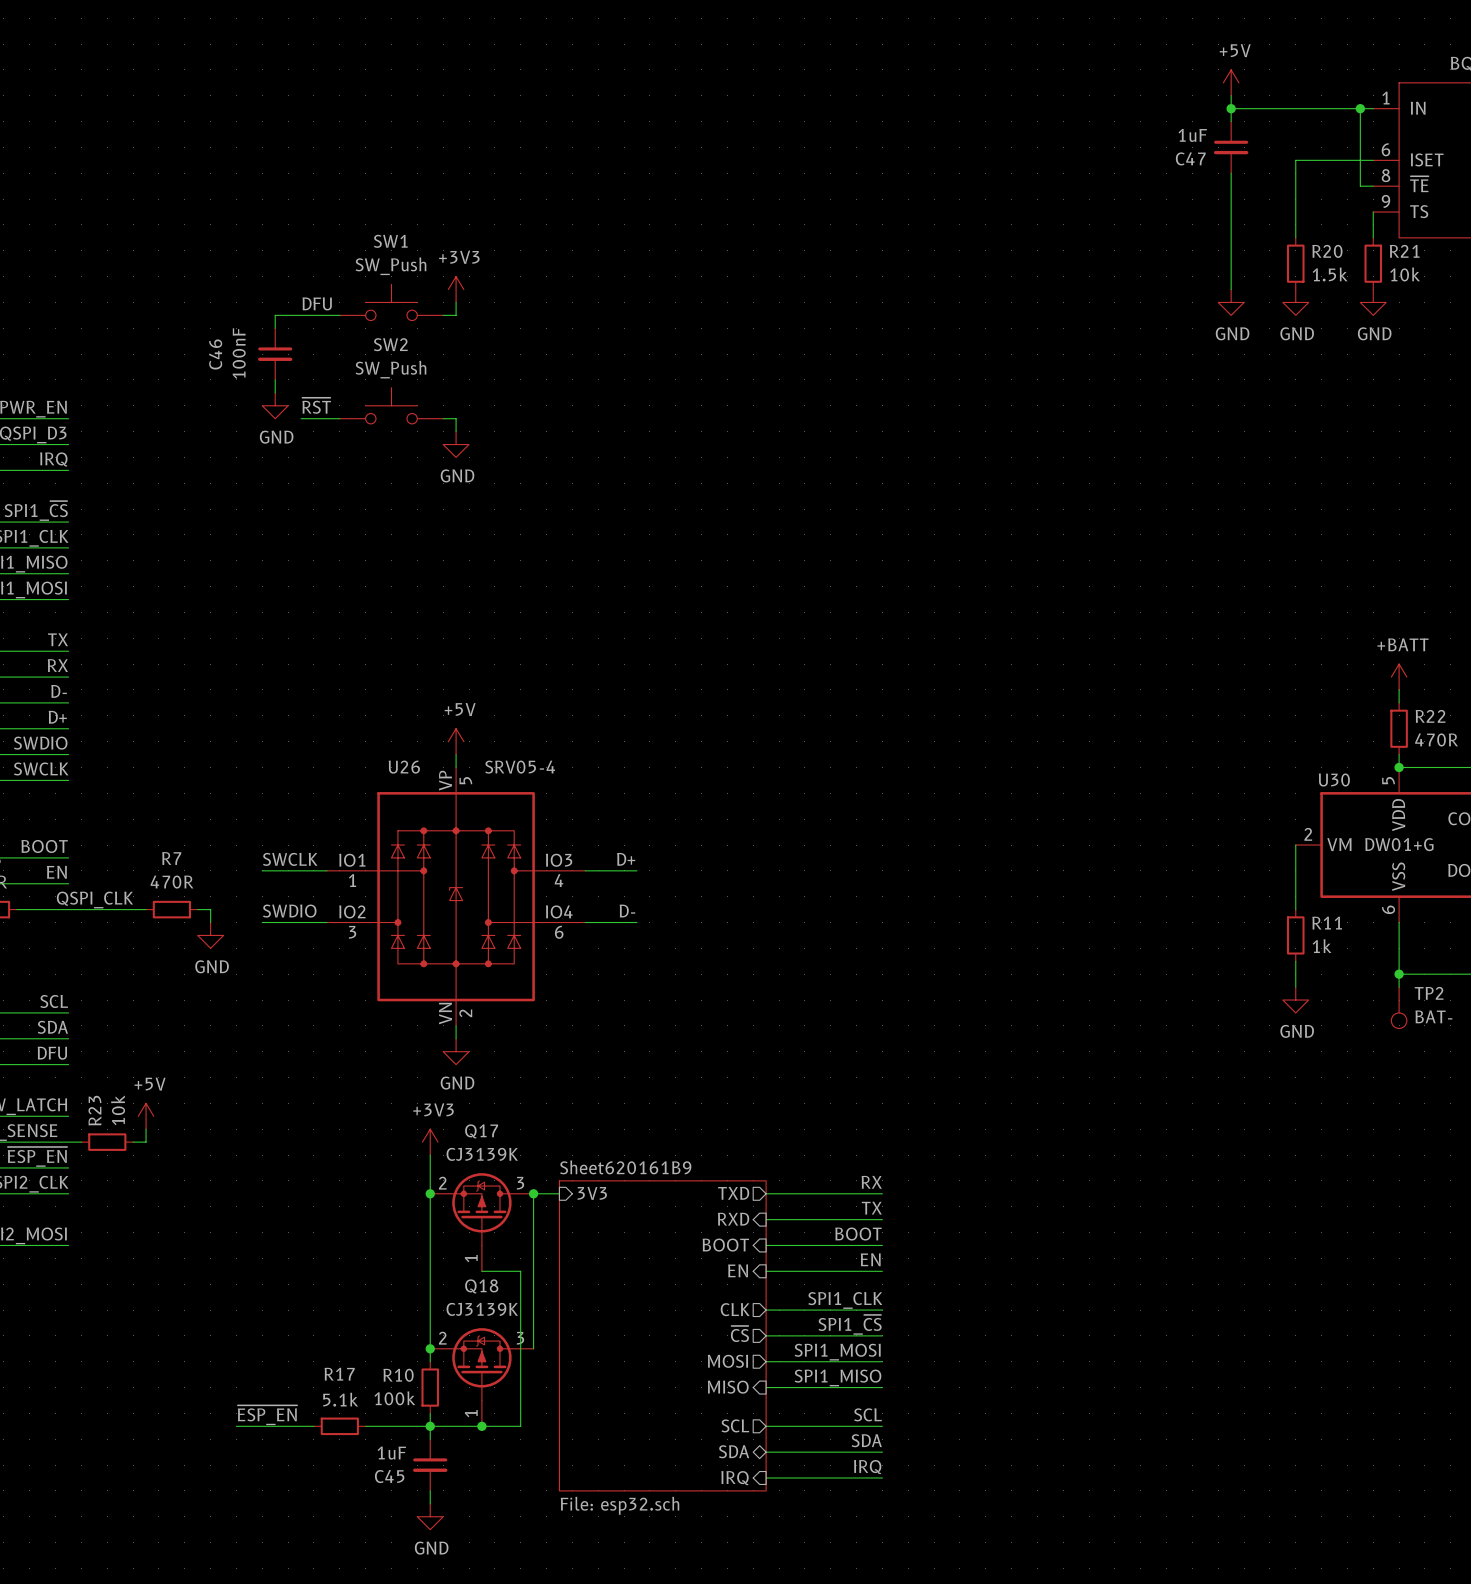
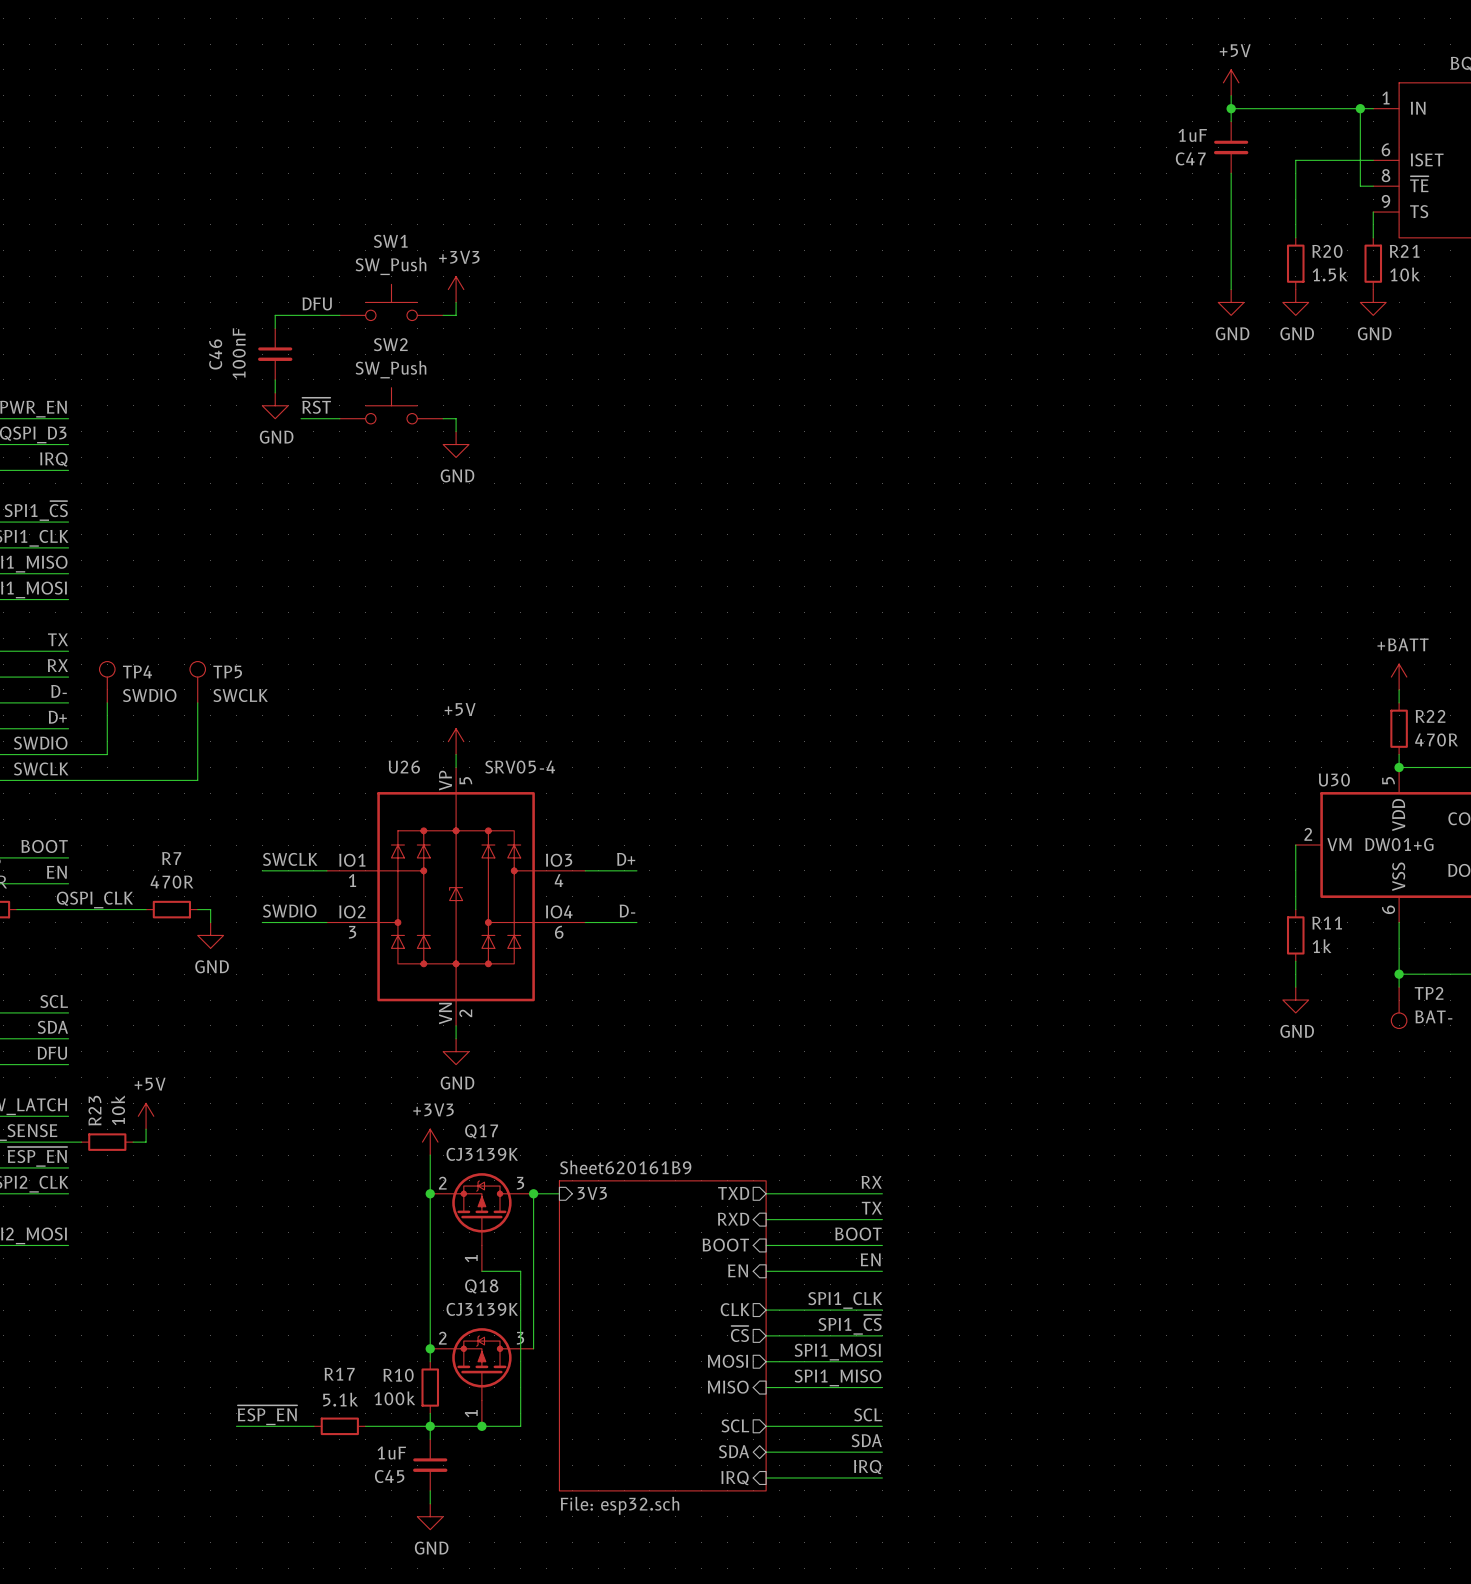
TP4: none -> SWDIO (107, 682)
TP5: none -> SWCLK (197, 682)
wire: none -> (107, 702) (107, 754) (68, 754)
wire: none -> (197, 702) (197, 780) (68, 780)

